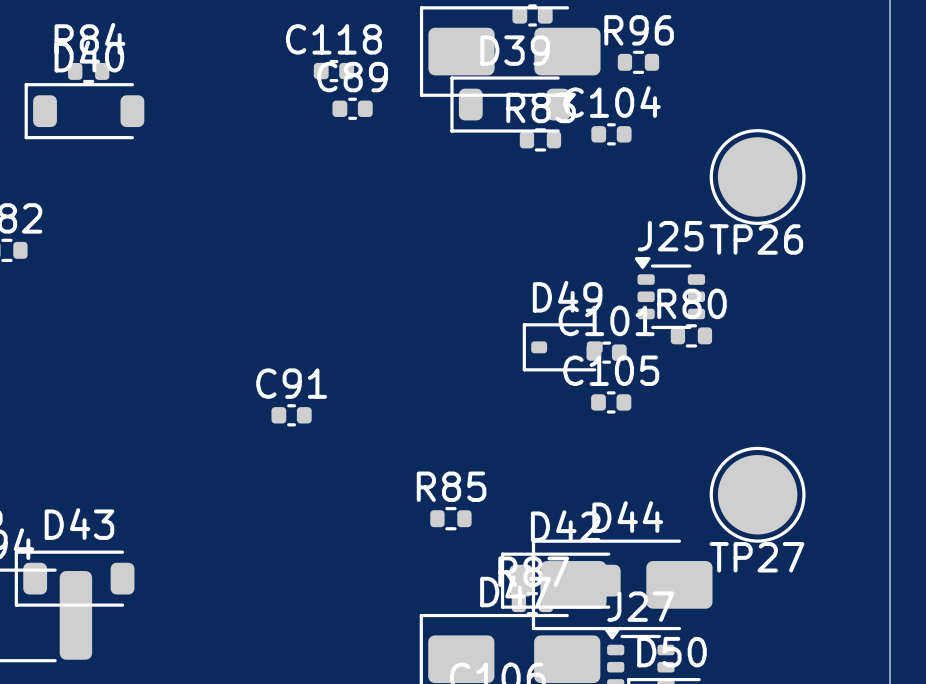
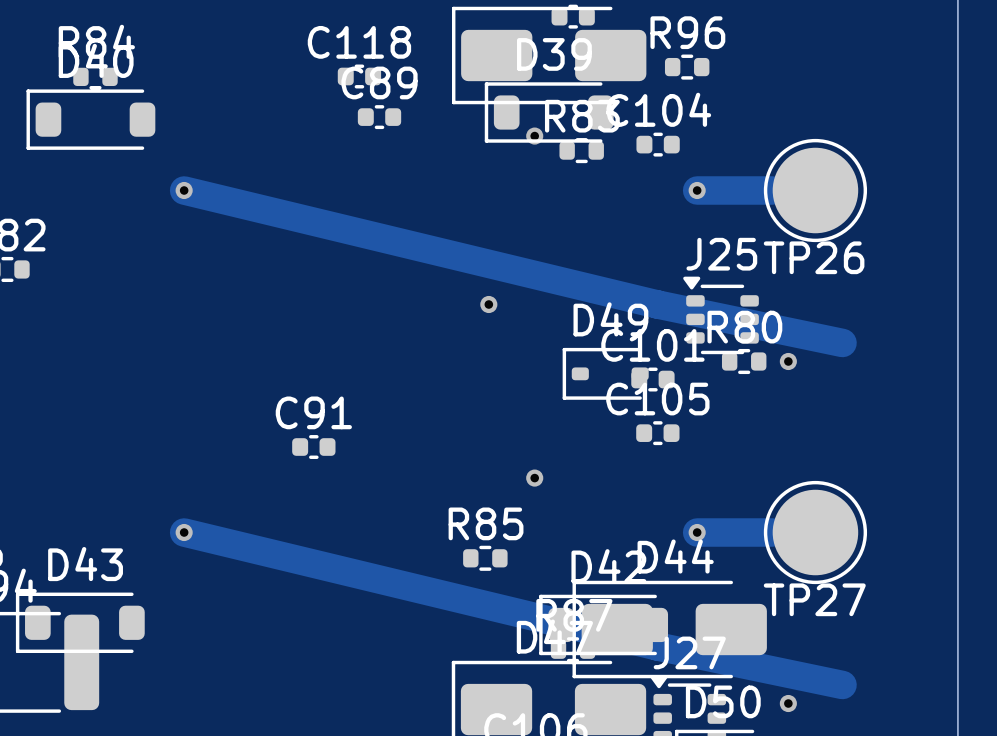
via: none -> (534, 136)
track: none -> (184, 190) (657, 304) (842, 342)
via: none -> (184, 190)
track: none -> (697, 190) (772, 190)
via: none -> (697, 190)
via: none -> (488, 304)
via: none -> (788, 361)
via: none -> (534, 478)
track: none -> (184, 532) (657, 646) (842, 684)
via: none -> (184, 532)
track: none -> (697, 532) (772, 532)
via: none -> (697, 532)
via: none -> (788, 703)

